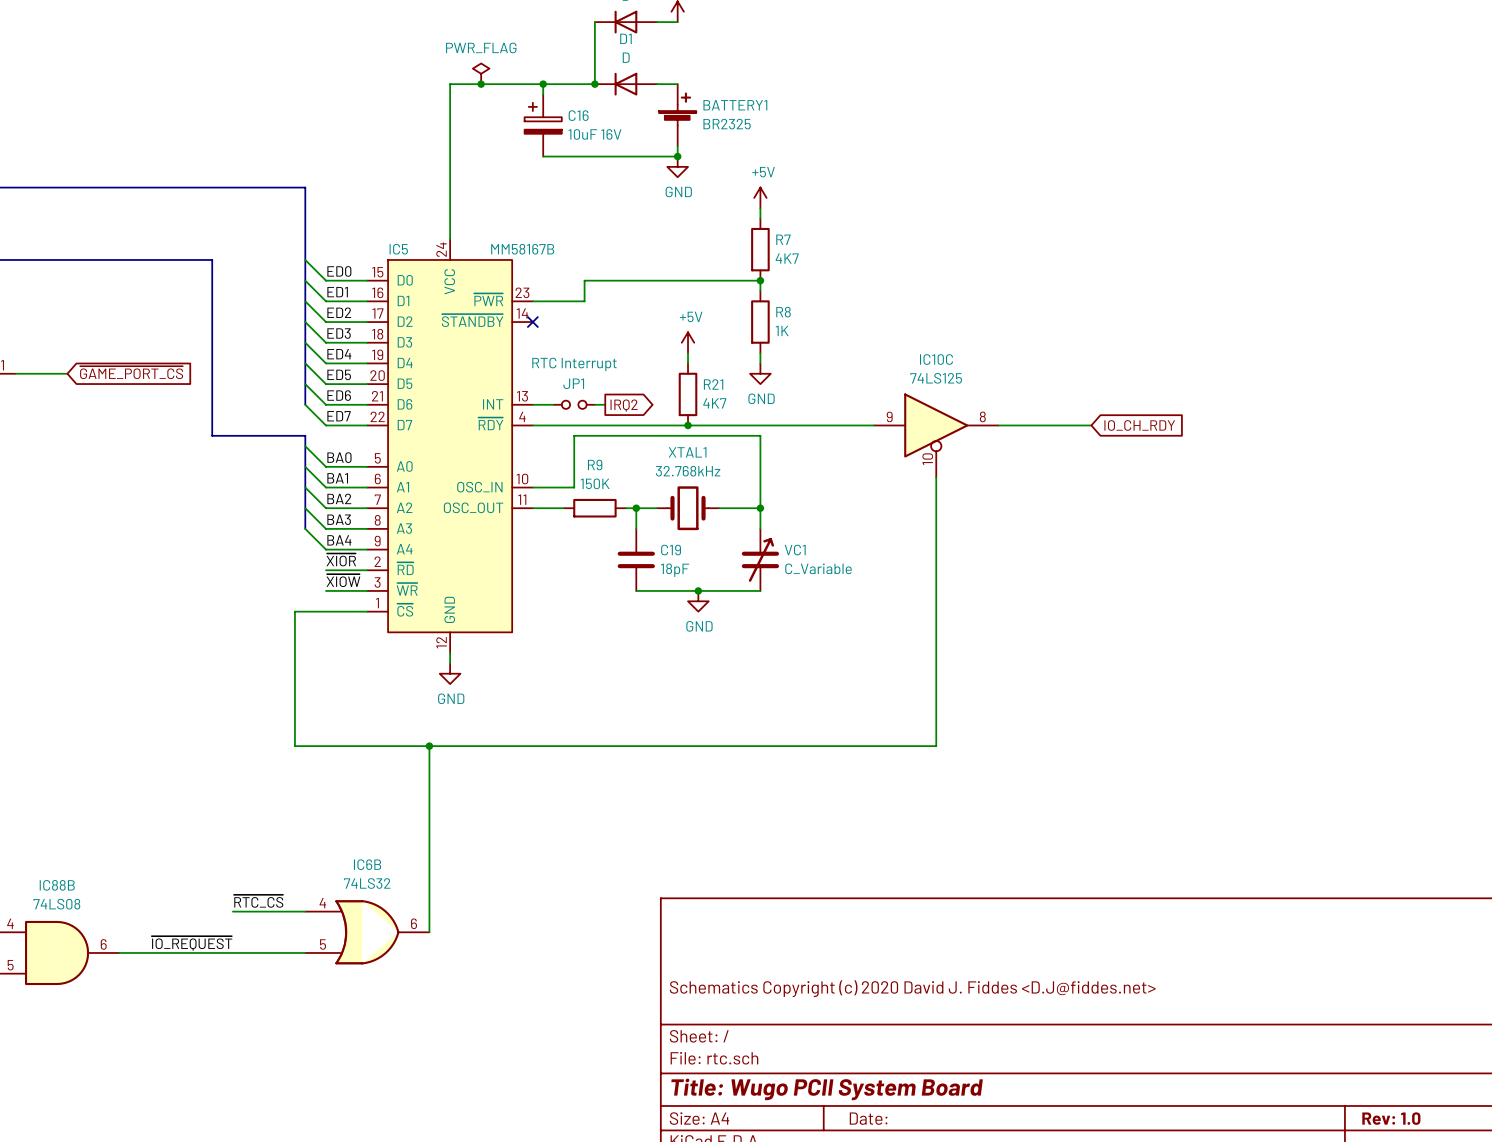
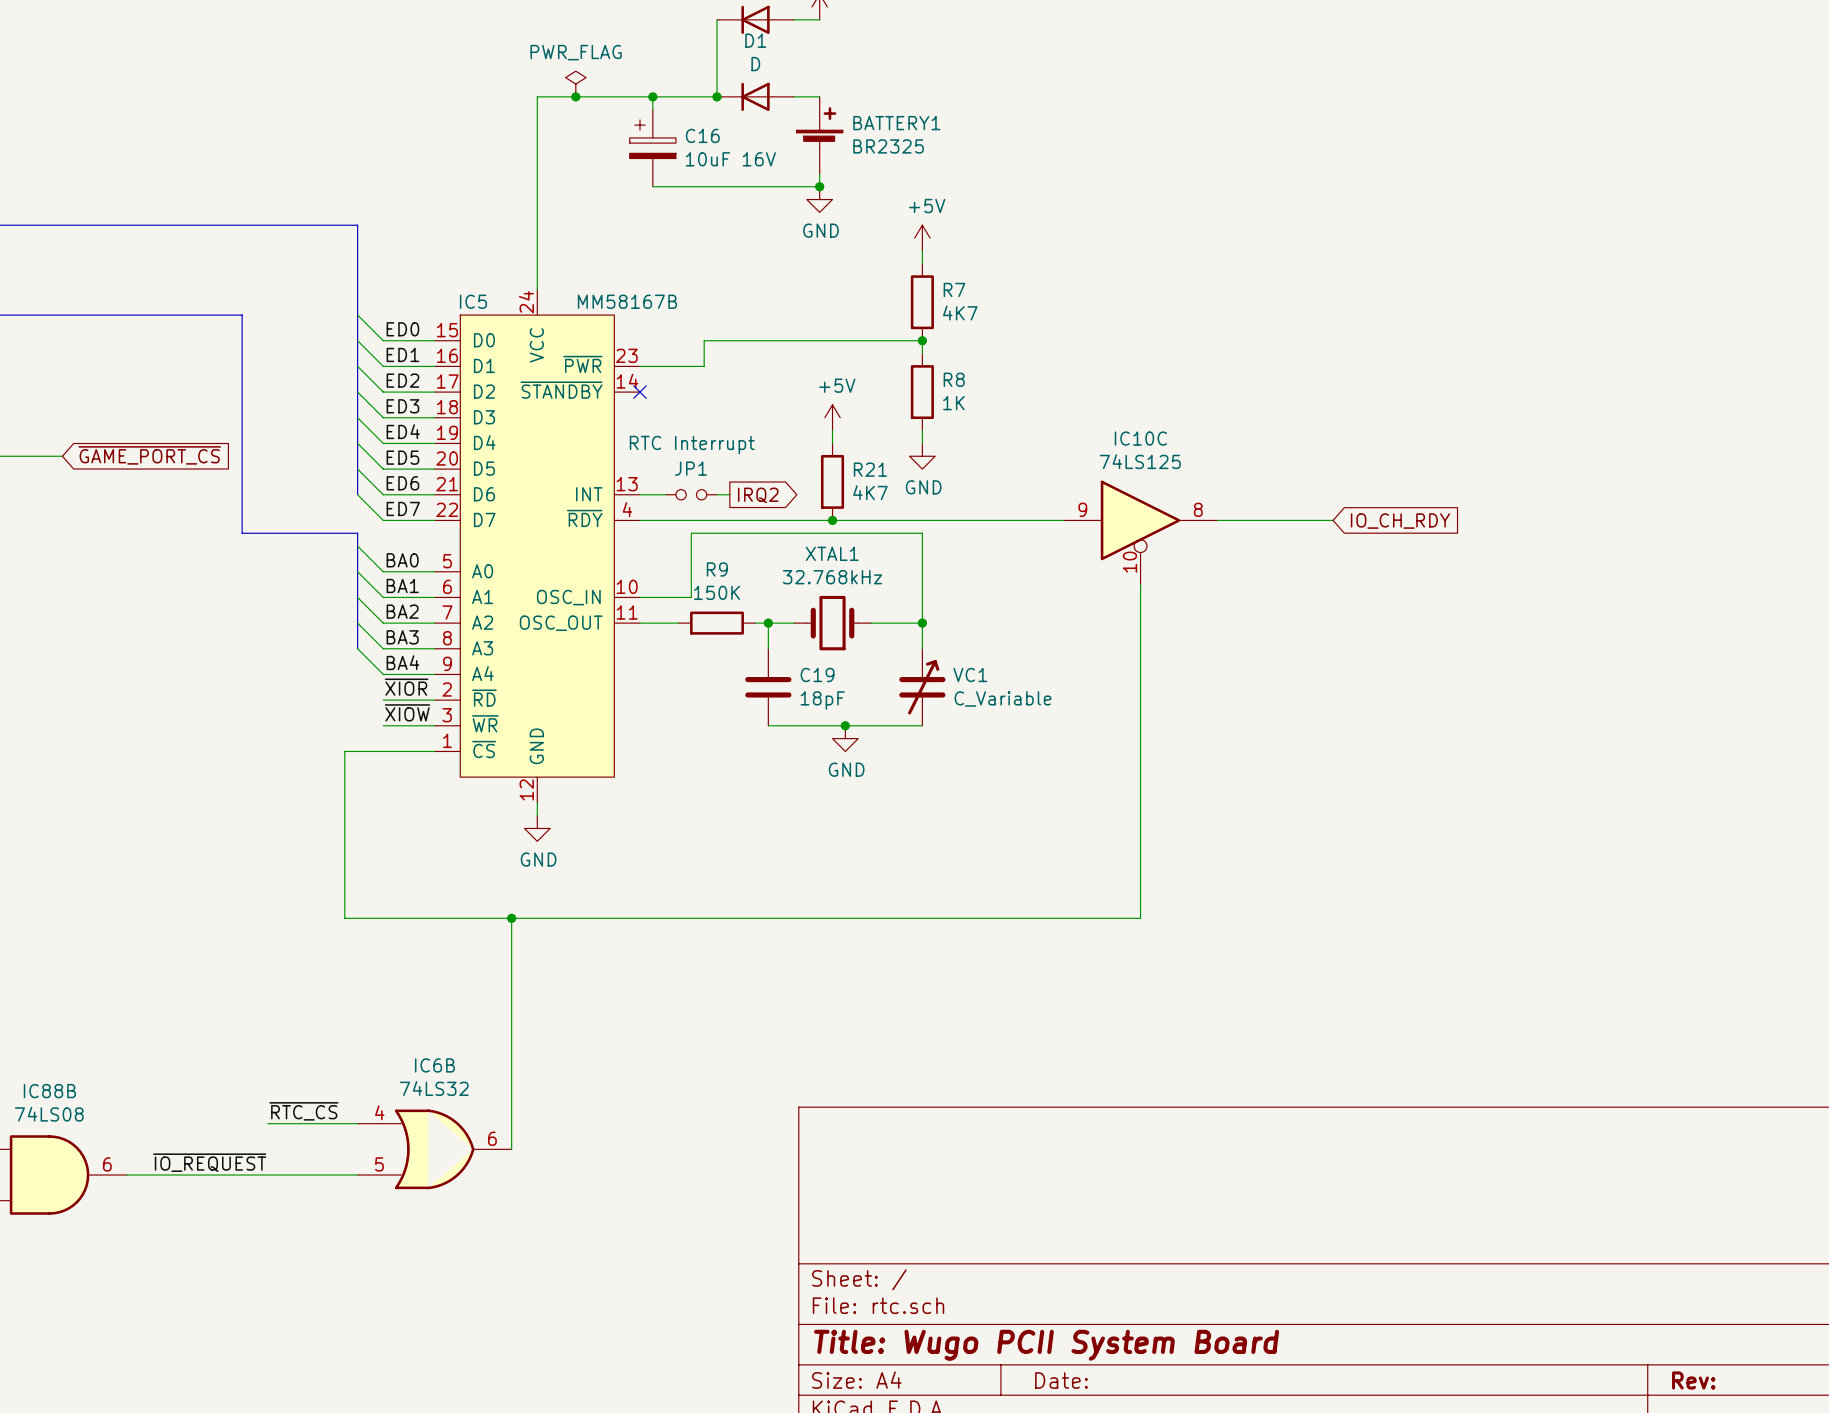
title block: Schematics Copyright (c) 2020 David J. Fiddes <D.J@fiddes.net> (912, 988) -> none
title block: Rev: 1.0 (1391, 1118) -> Rev: (1693, 1380)

